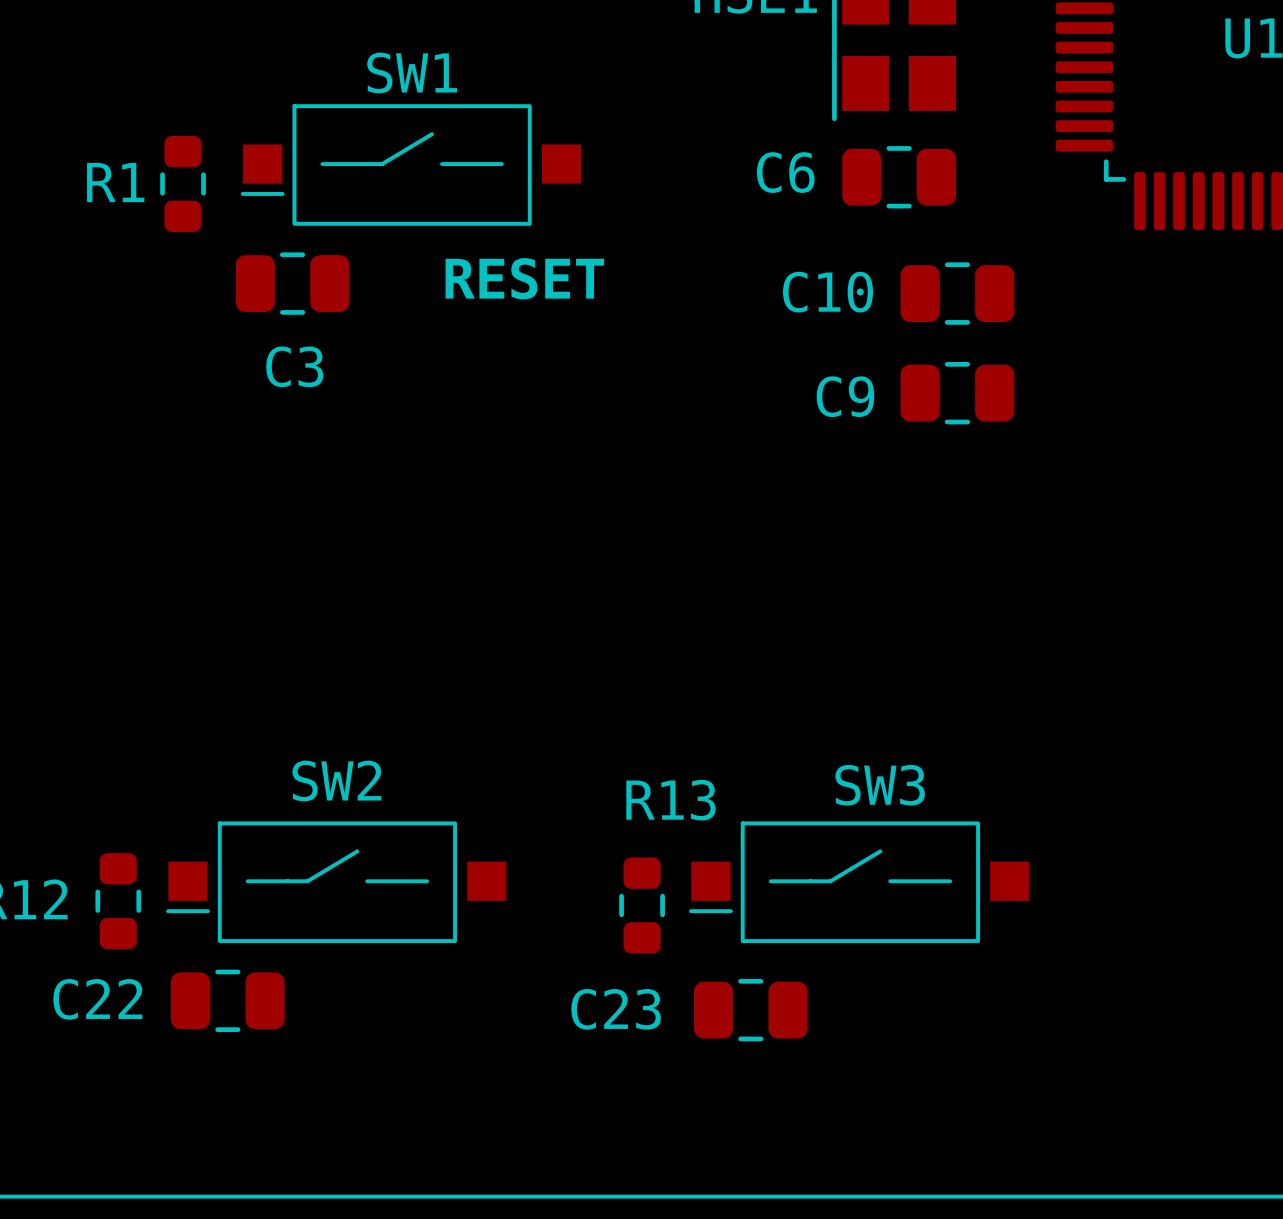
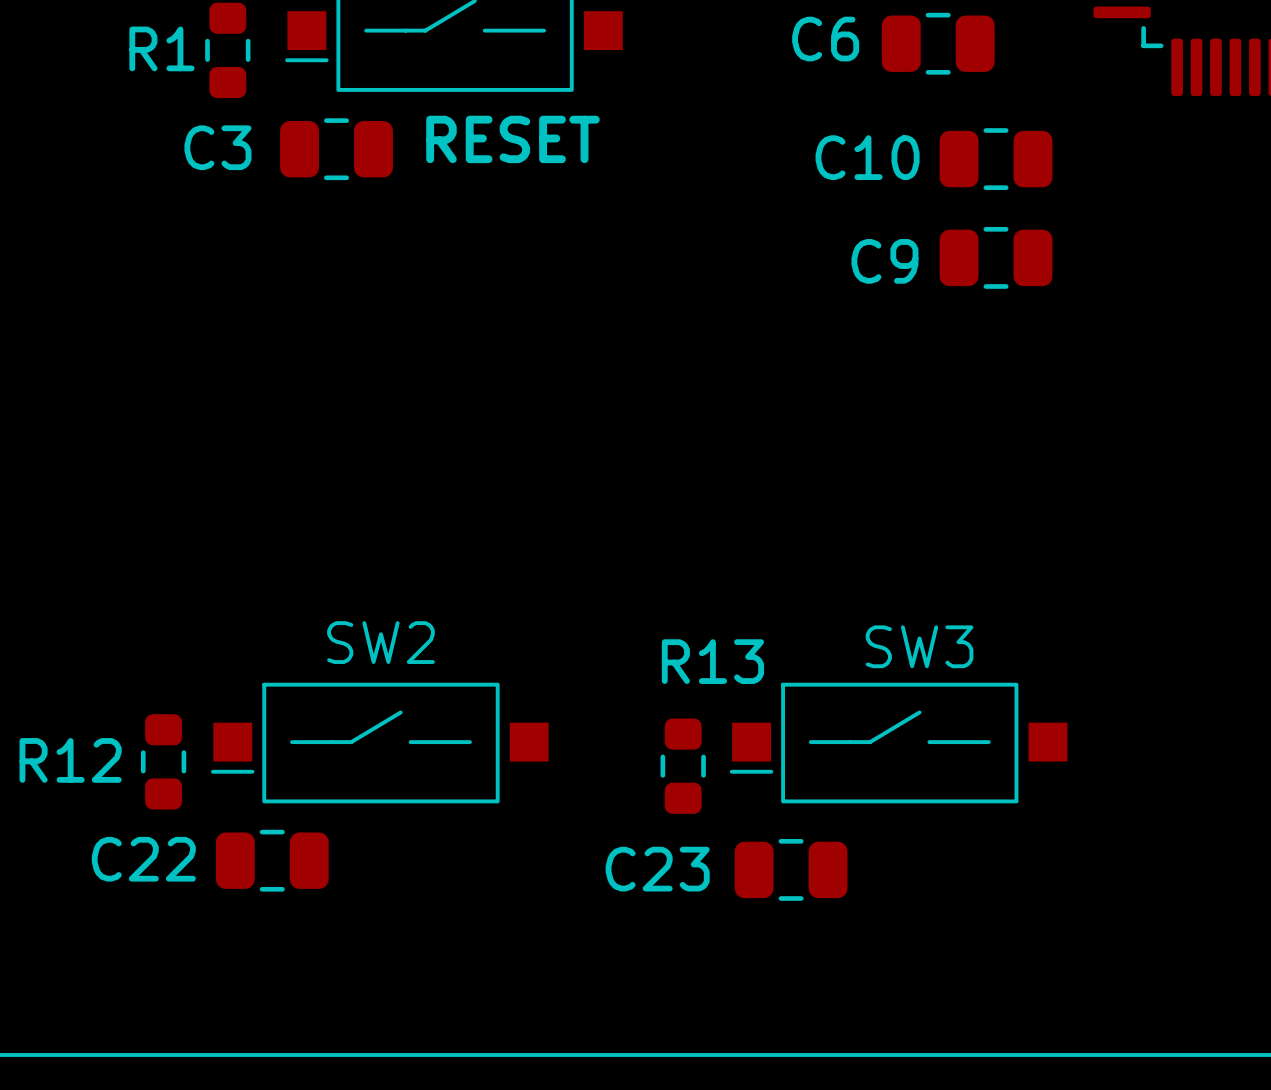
text position: RESET (524, 278) -> RESET (513, 139)
C3 name position: C3 (294, 366) -> C3 (217, 147)

